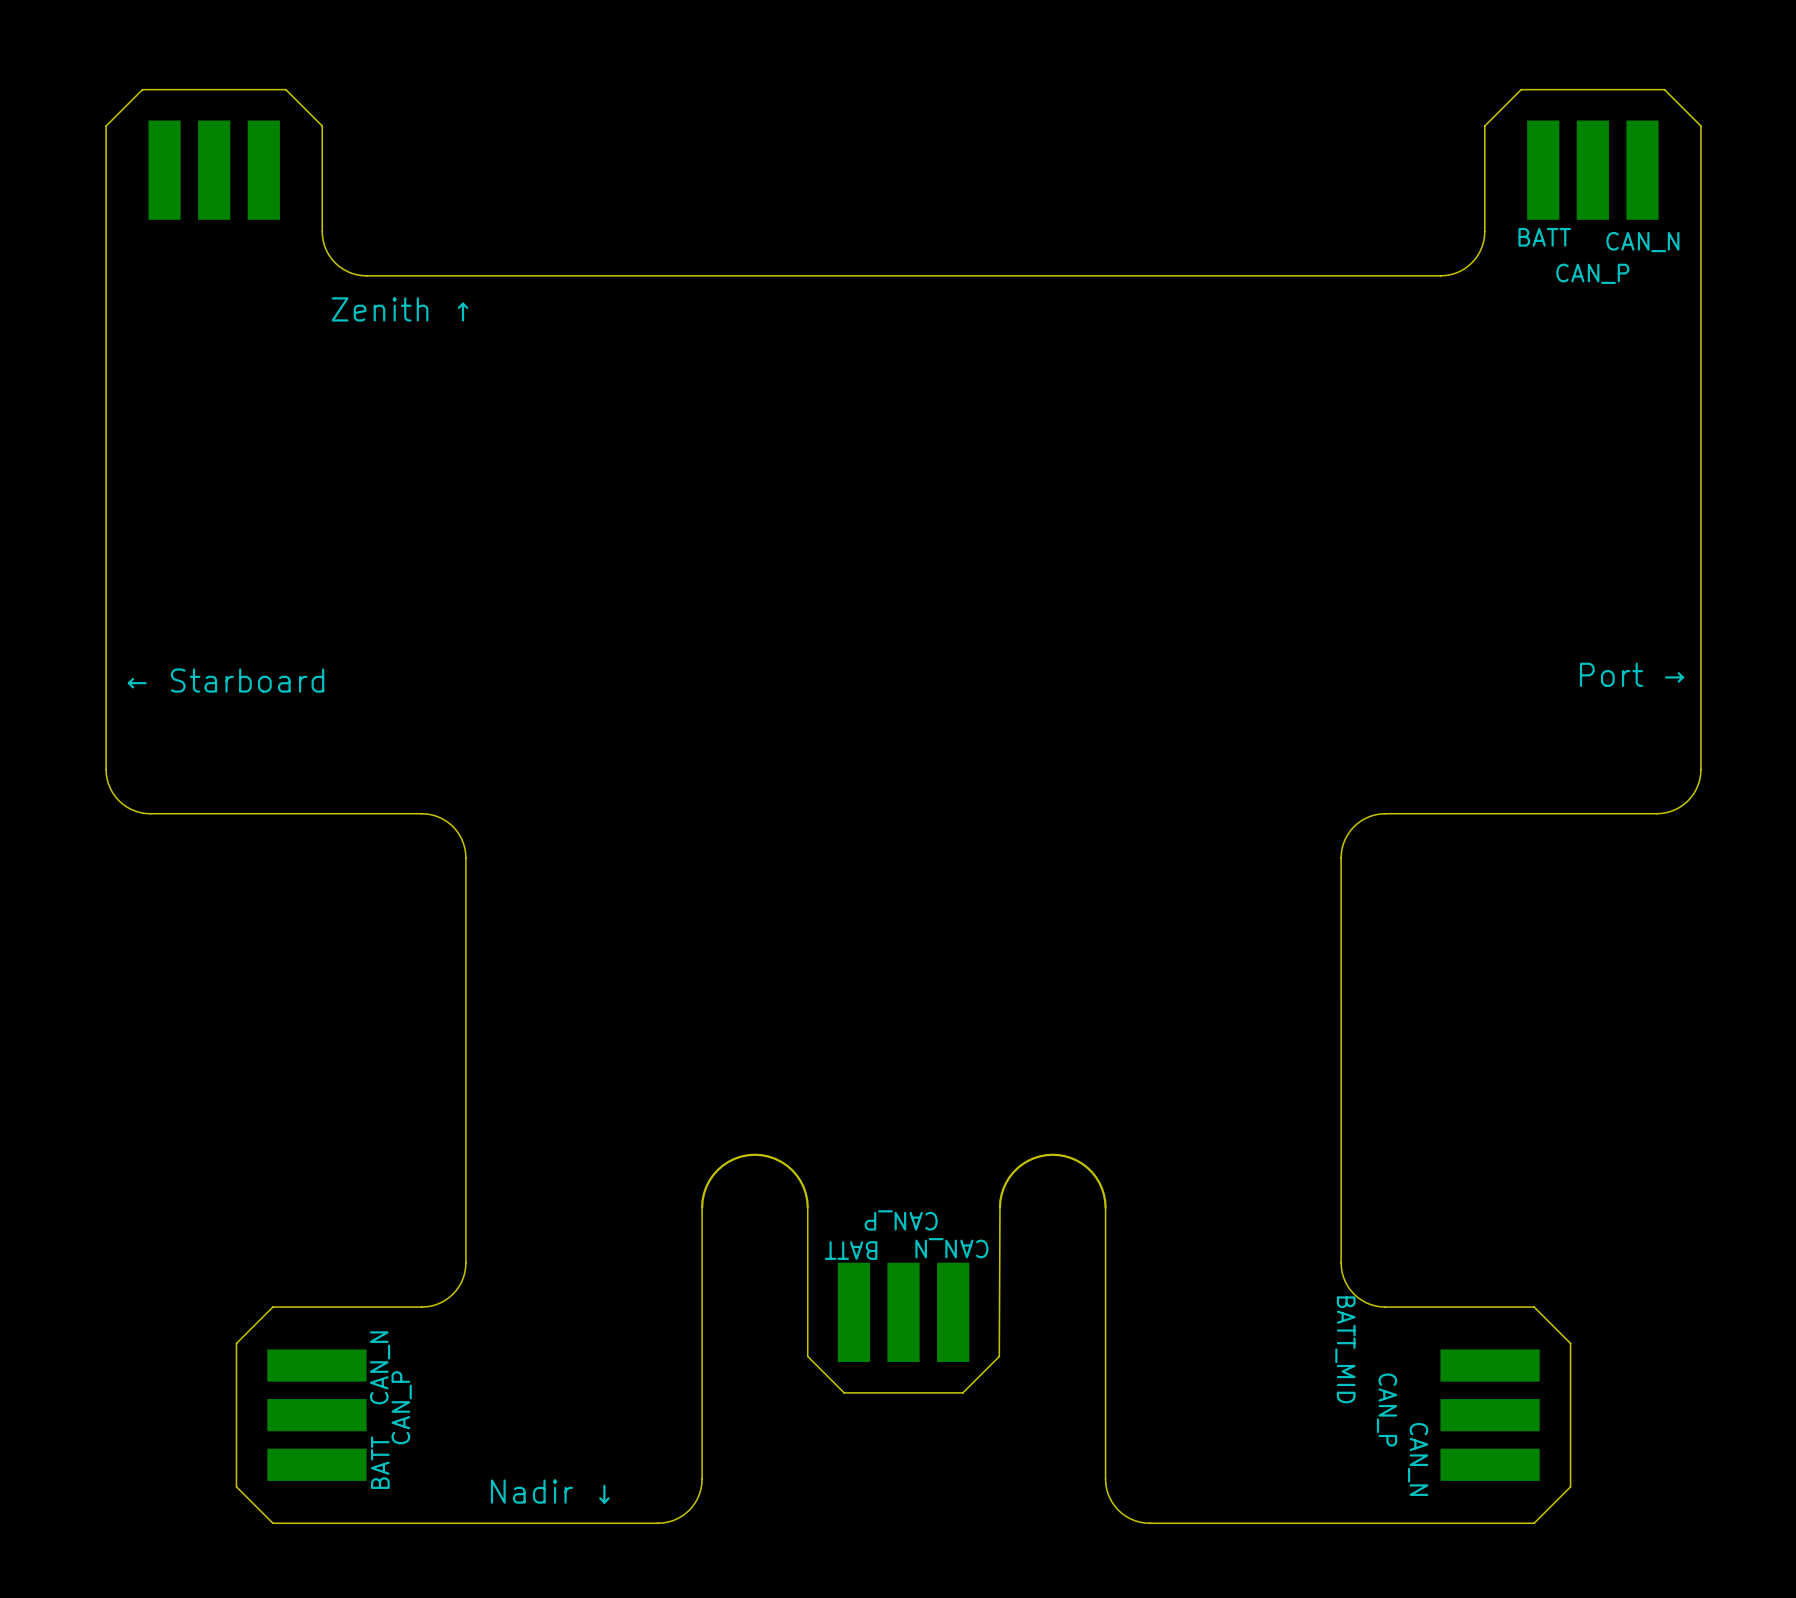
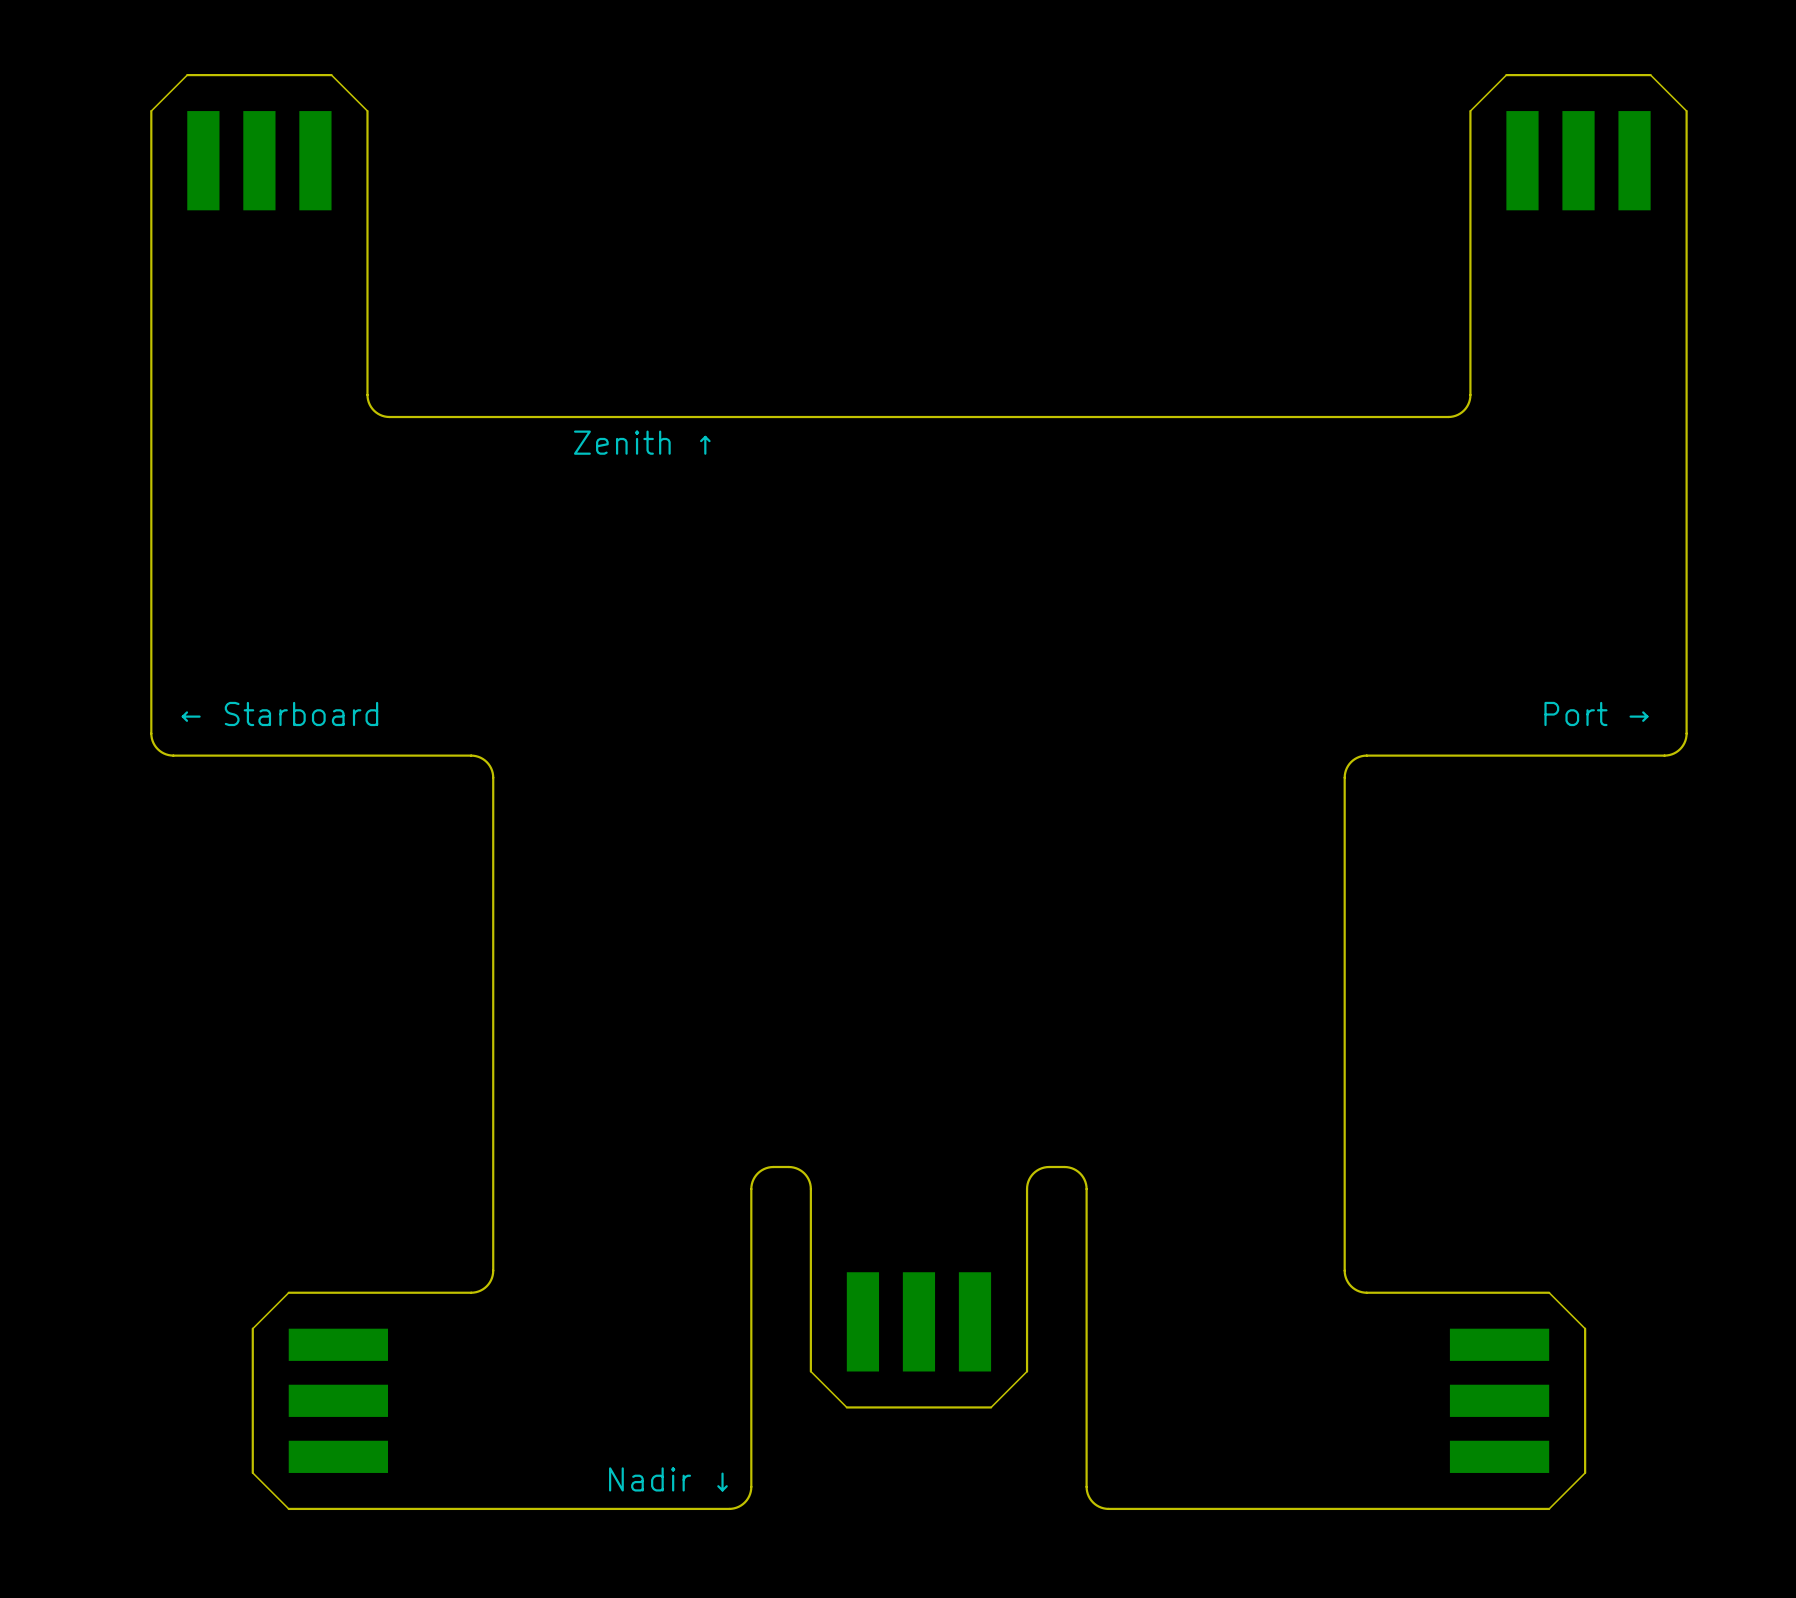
part footprint: [105, 89, 1702, 1524] -> [150, 74, 1688, 1511]
text: BATT (1544, 237) -> none
text: CAN_N (1642, 242) -> none
text: CAN_P (1592, 273) -> none
text: CAN_P (901, 1220) -> none
text: CAN_N (951, 1248) -> none
text: BATT (851, 1250) -> none
text: BATT_MID (1345, 1349) -> none
text: CAN_N (380, 1367) -> none
text: CAN_P (401, 1407) -> none
text: CAN_P (1387, 1410) -> none
text: CAN_N (1418, 1459) -> none
text: BATT (380, 1462) -> none

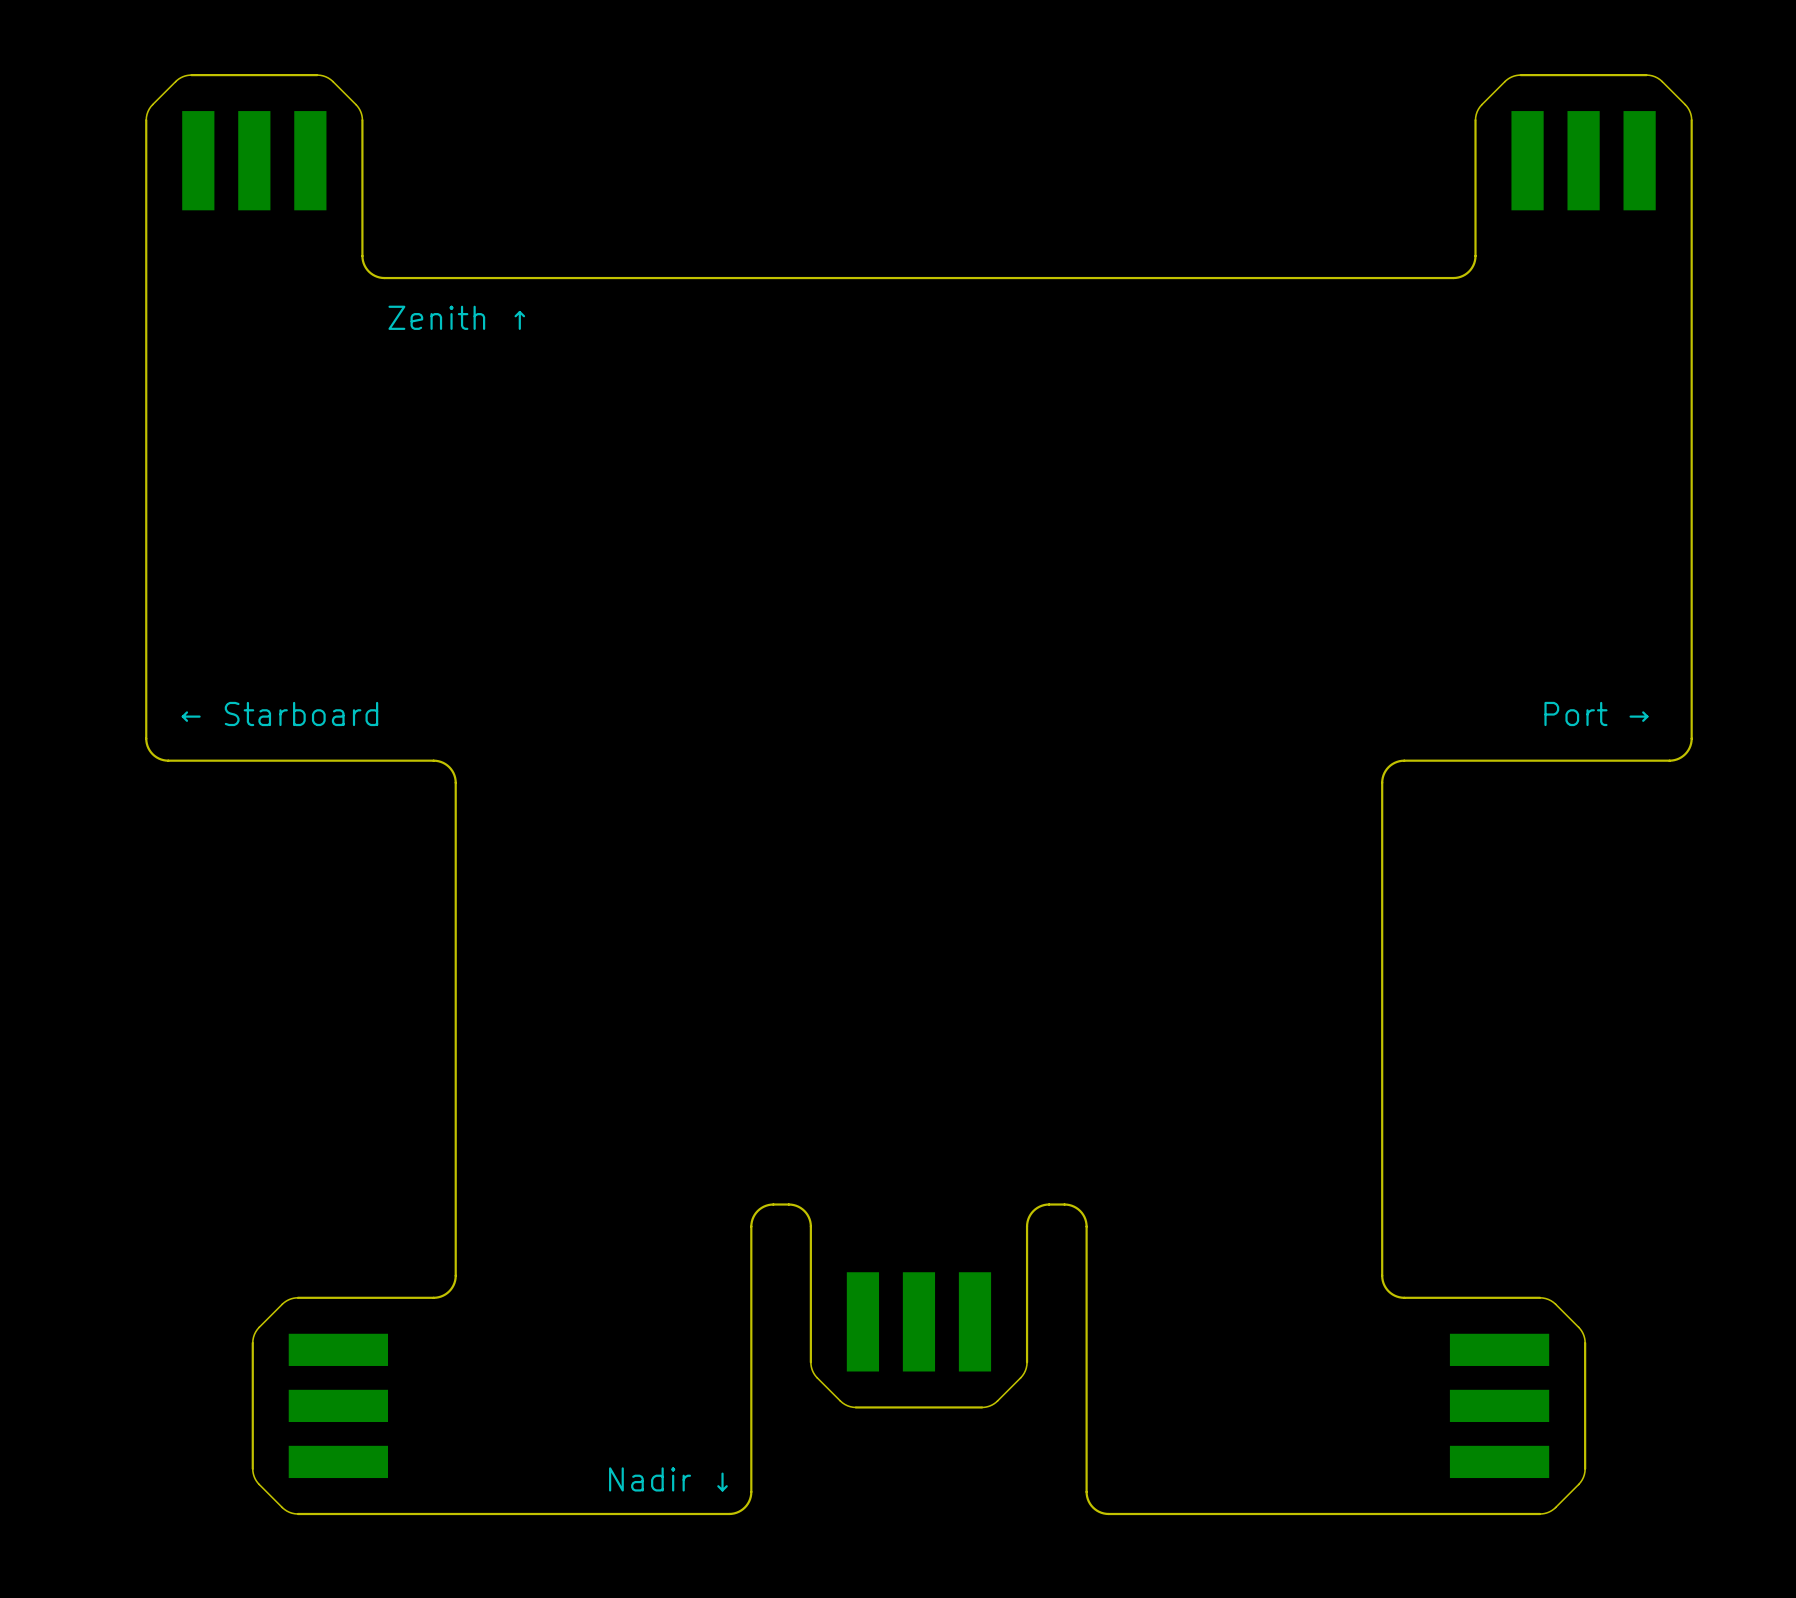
part footprint: [150, 74, 1688, 1511] -> [145, 74, 1693, 1516]

